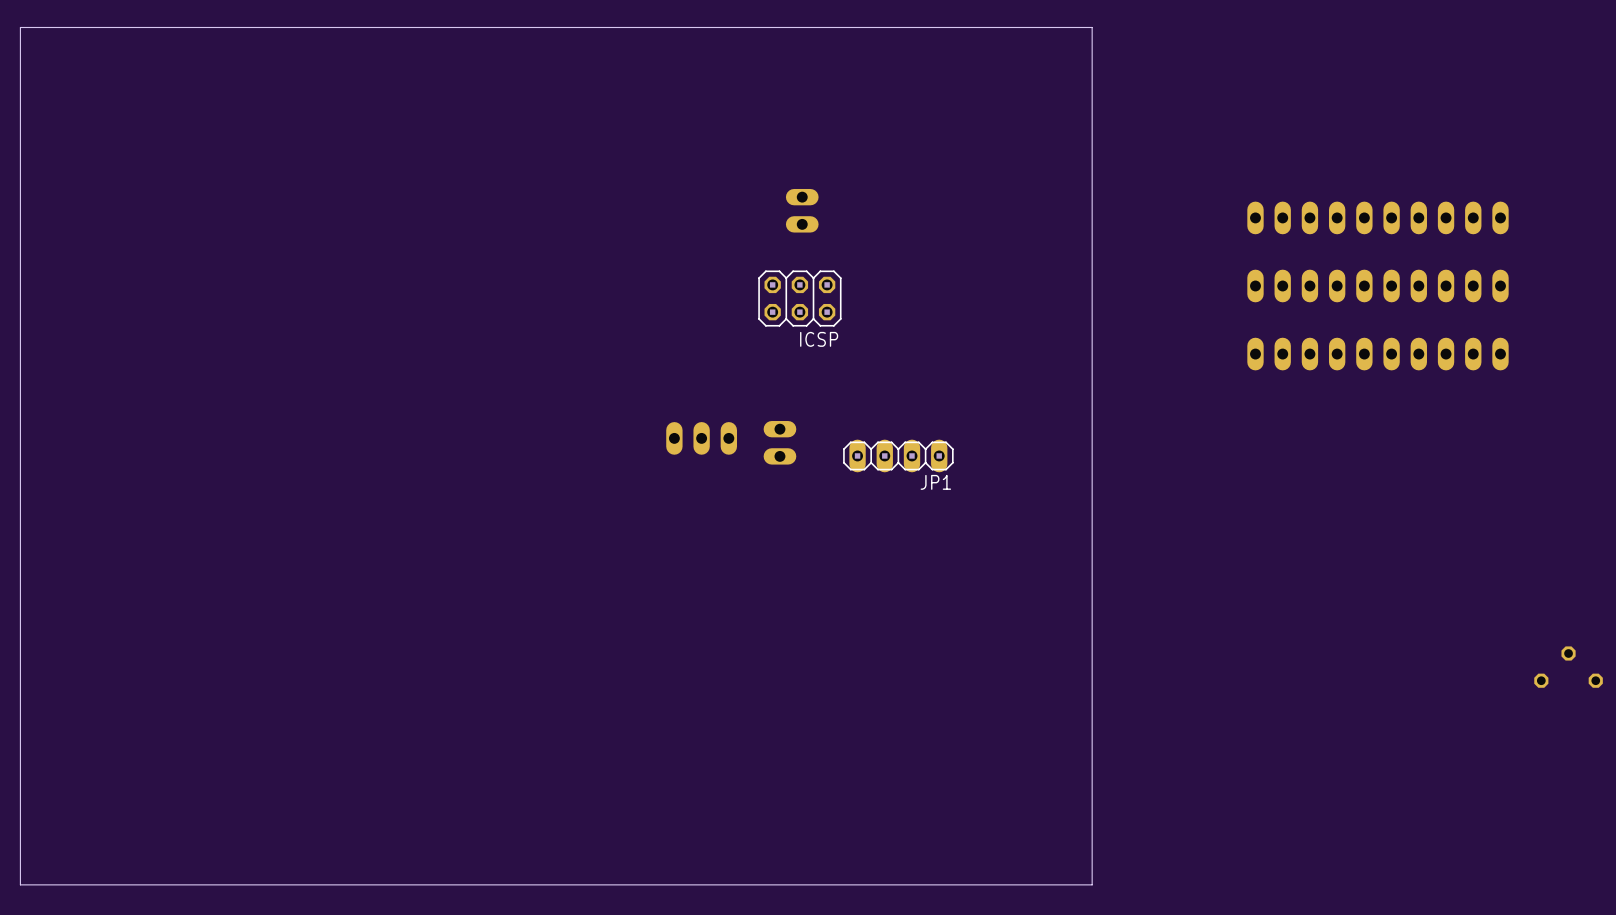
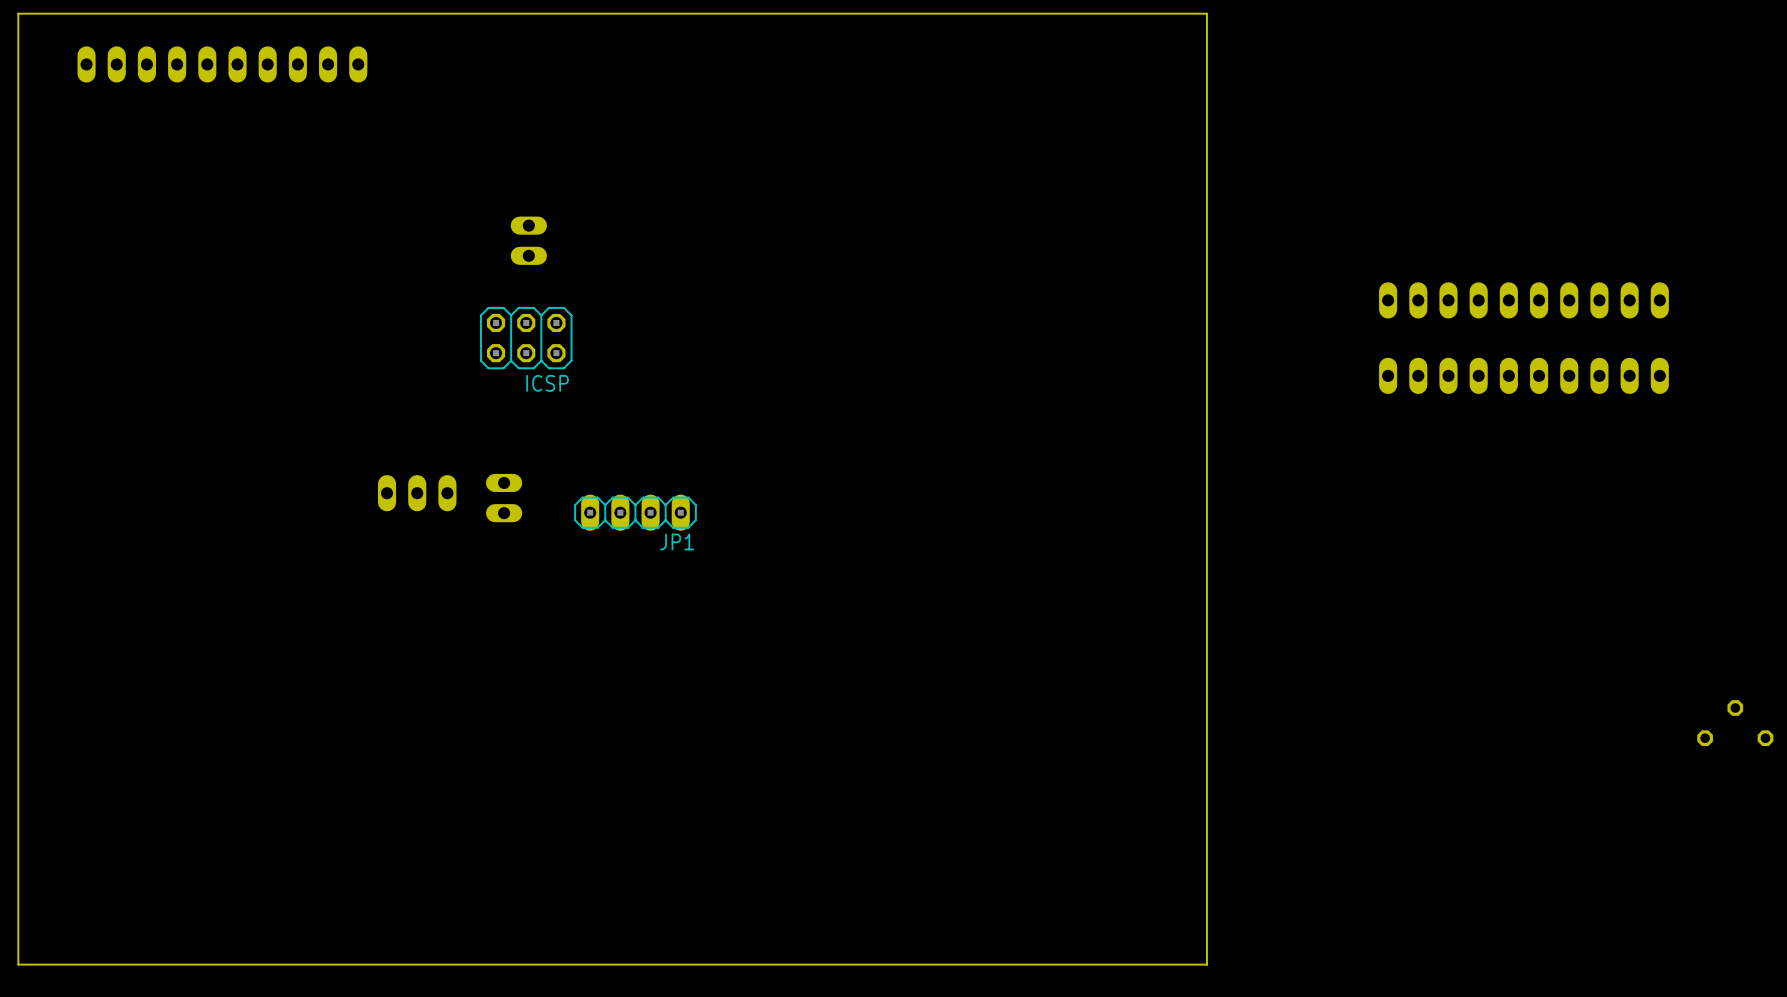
part: none -> (222, 64)
part: (802, 210) -> none
part: (1377, 217) -> none
part: none -> (528, 240)
ICSP: (799, 298) -> none
ICSP: none -> (526, 338)
part: (701, 438) -> none
part: (779, 442) -> none
JP1 position: (898, 455) -> (635, 512)
part: none -> (417, 493)
part: none -> (504, 498)

